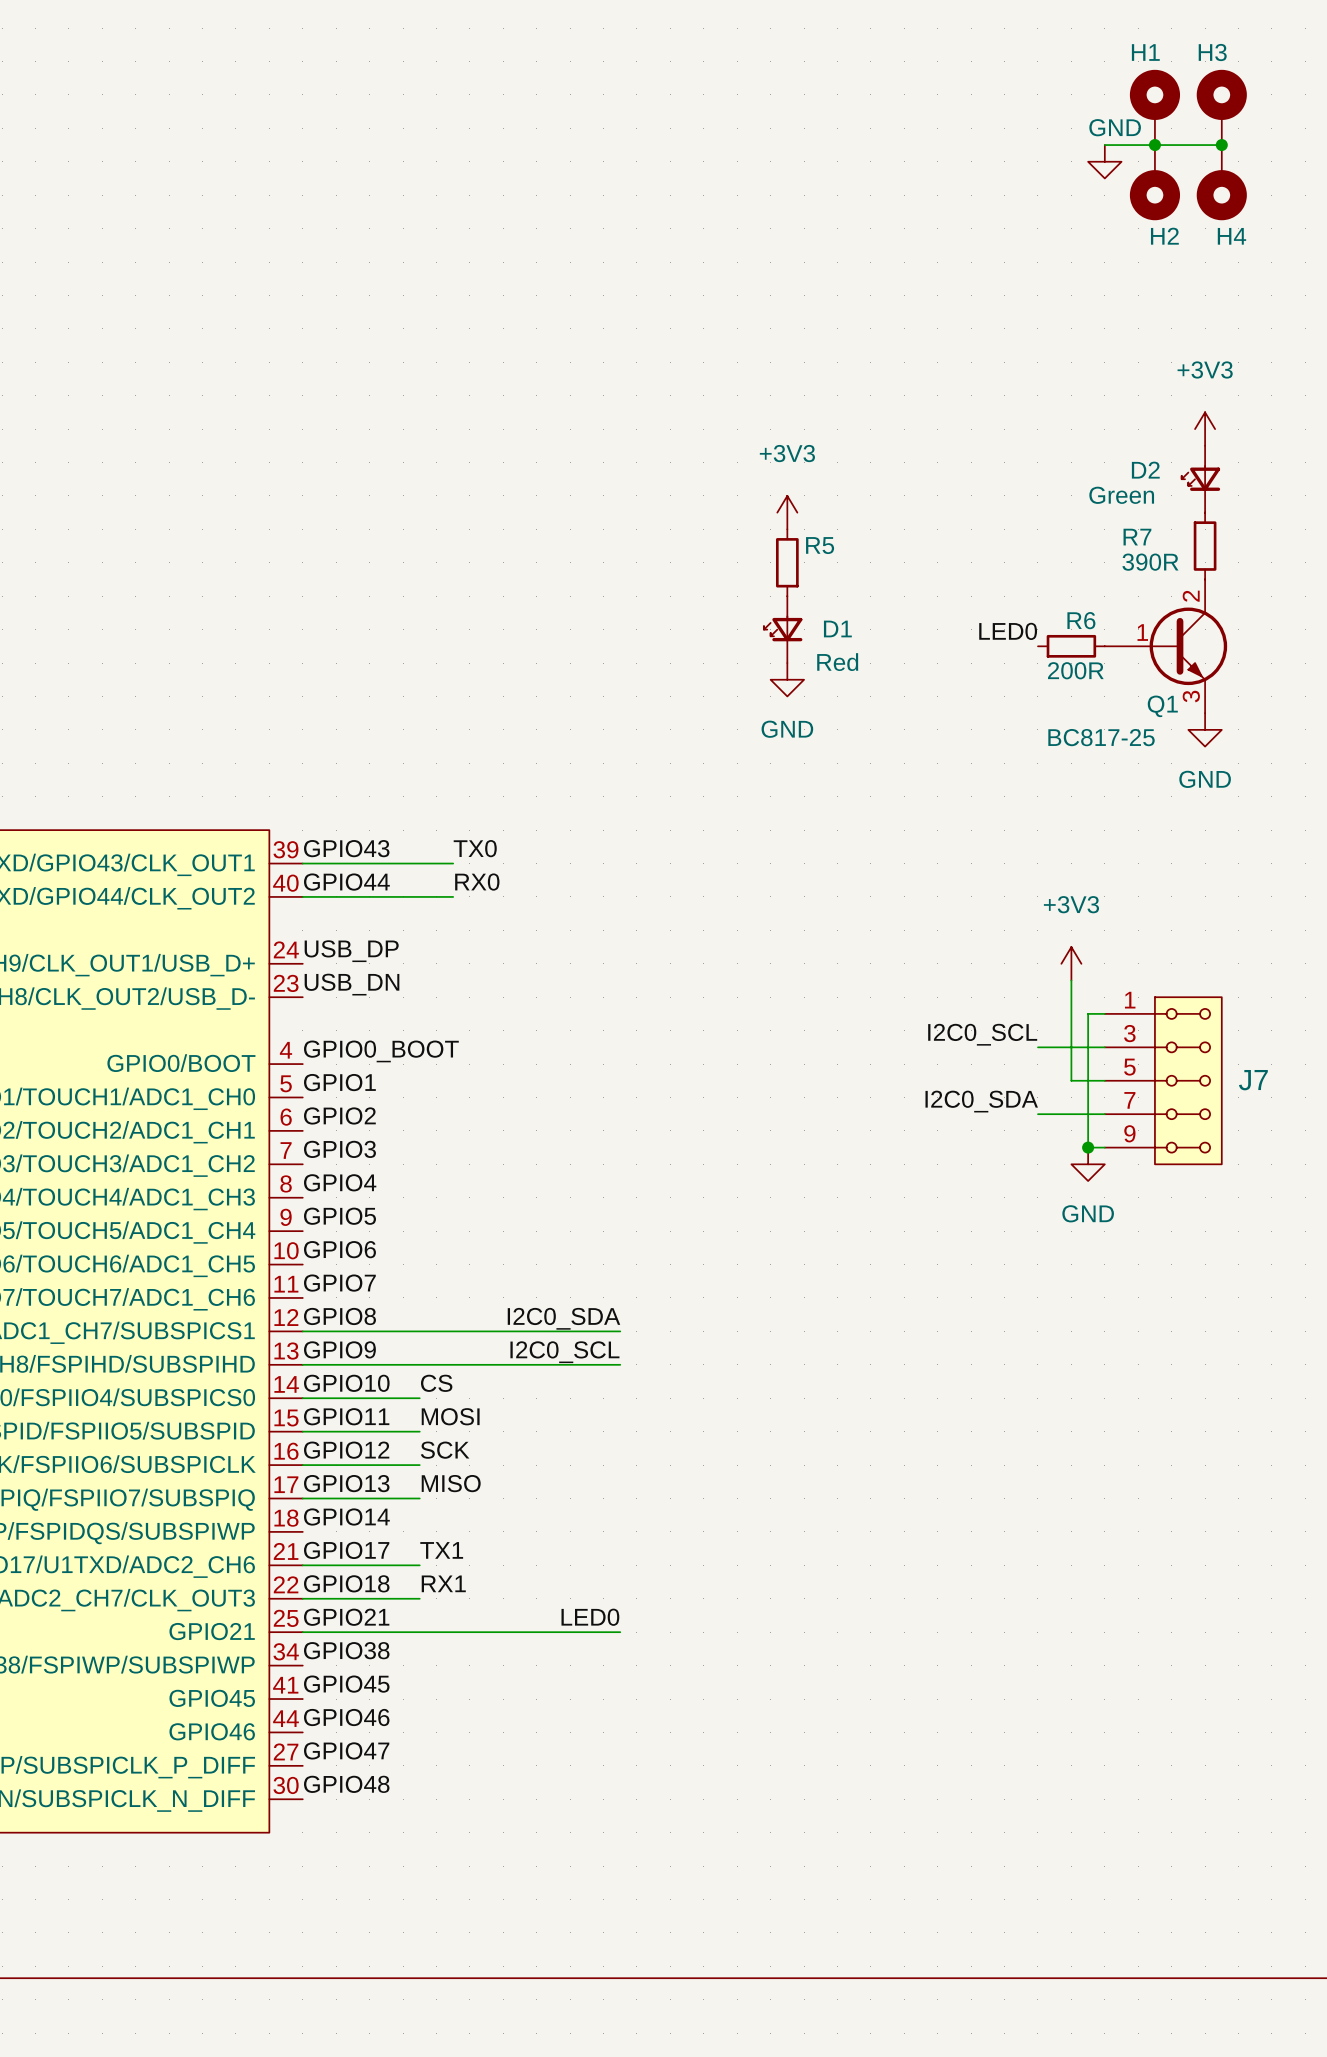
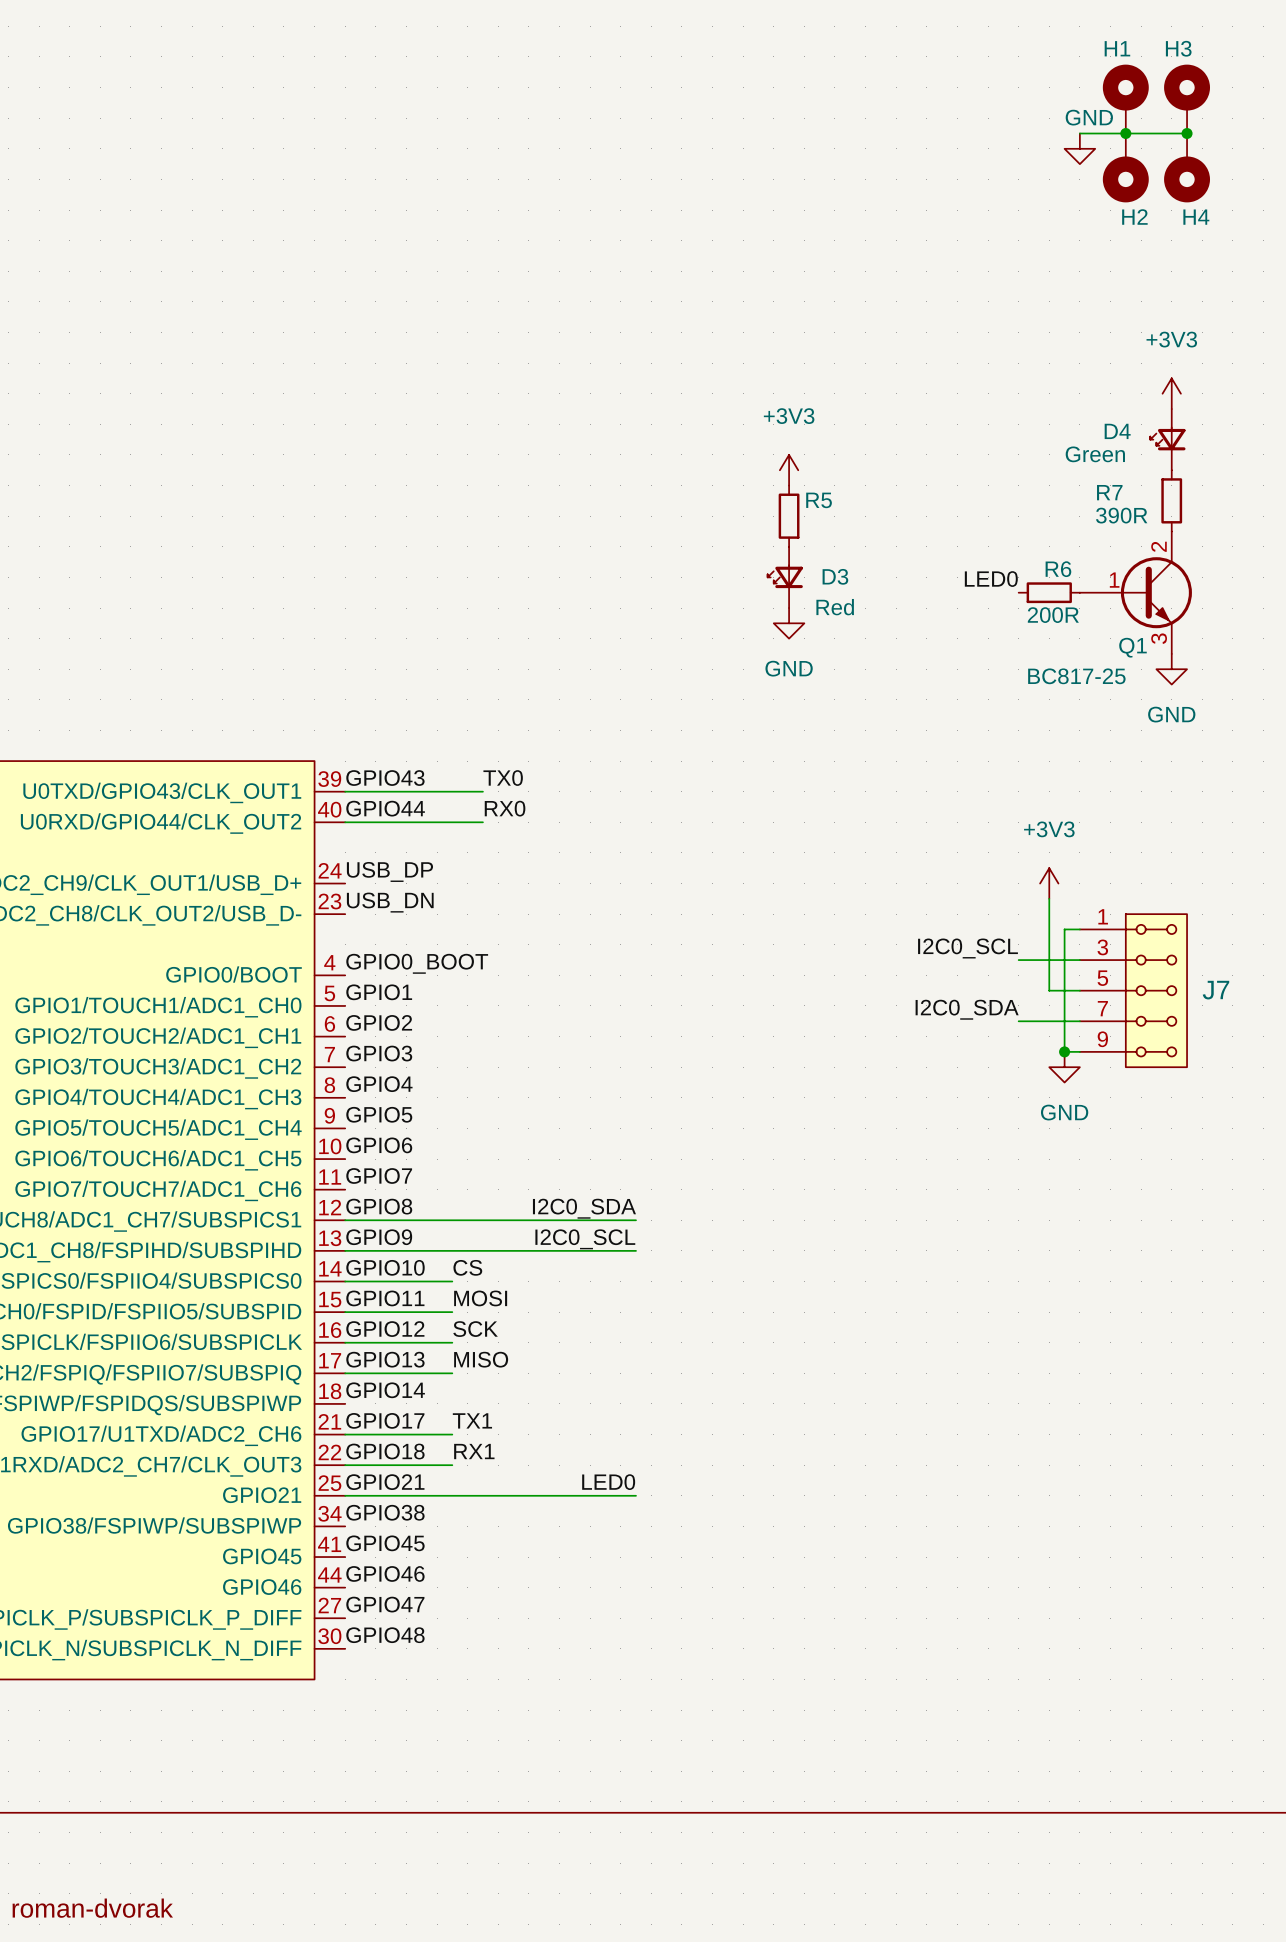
D2 name: D2 (1145, 470) -> D4 (1117, 431)
D1 name: D1 (837, 628) -> D3 (835, 576)

